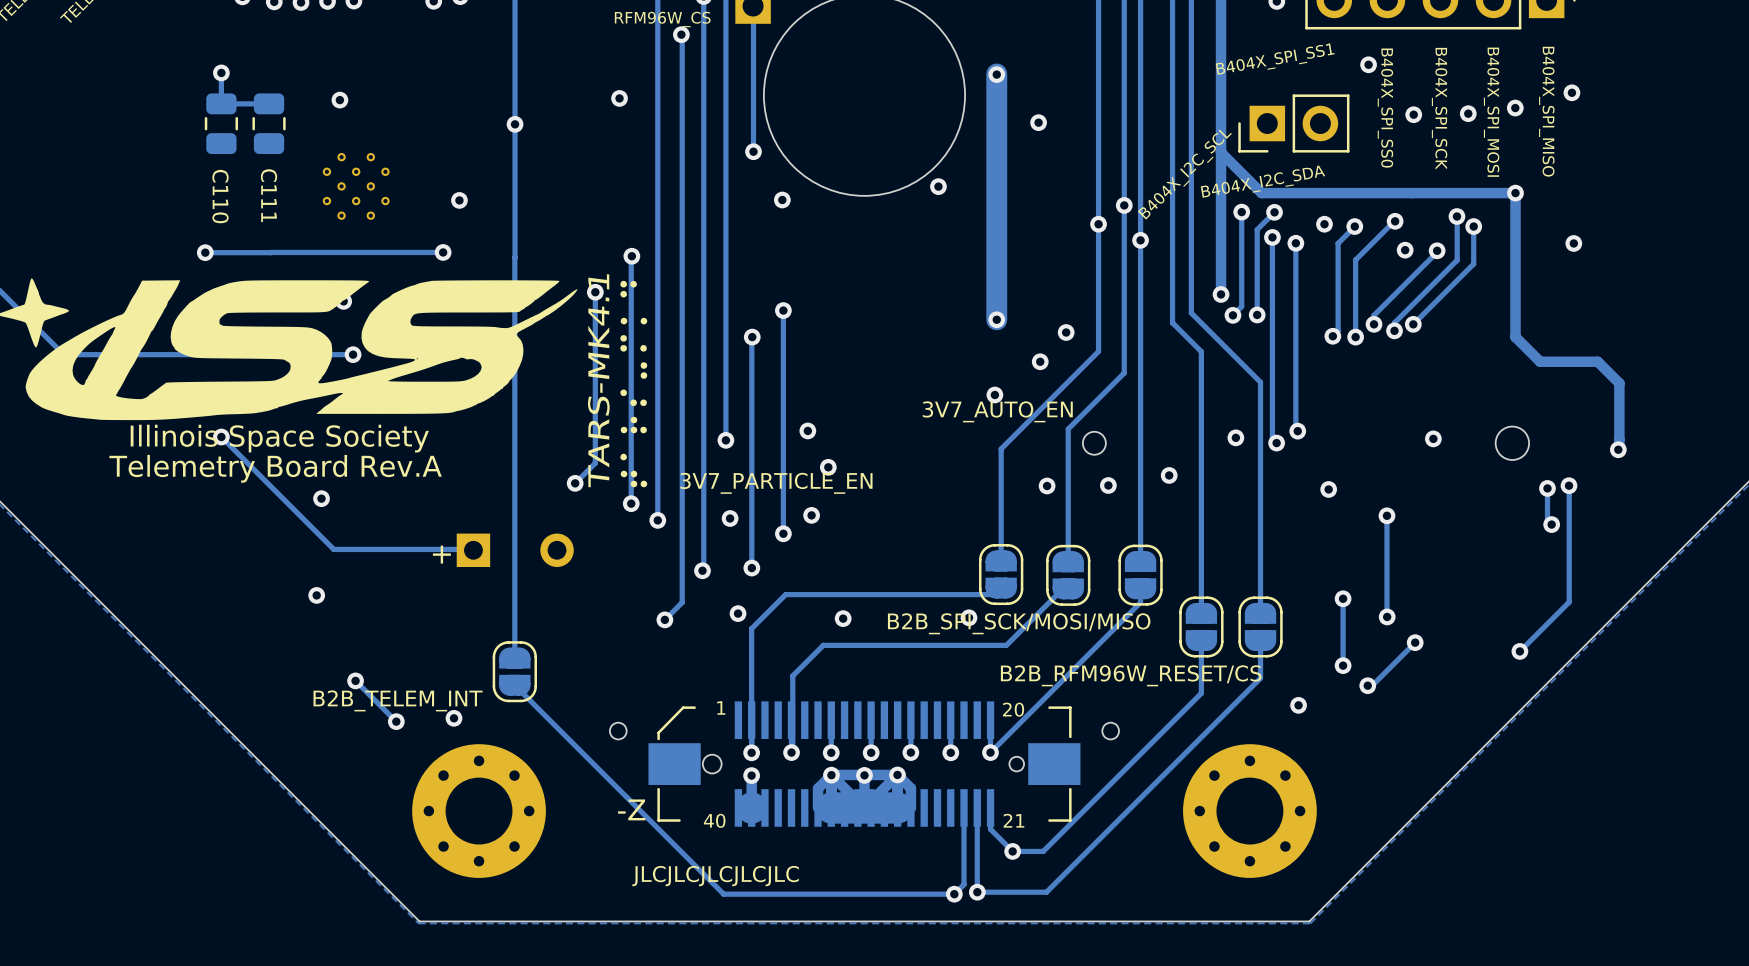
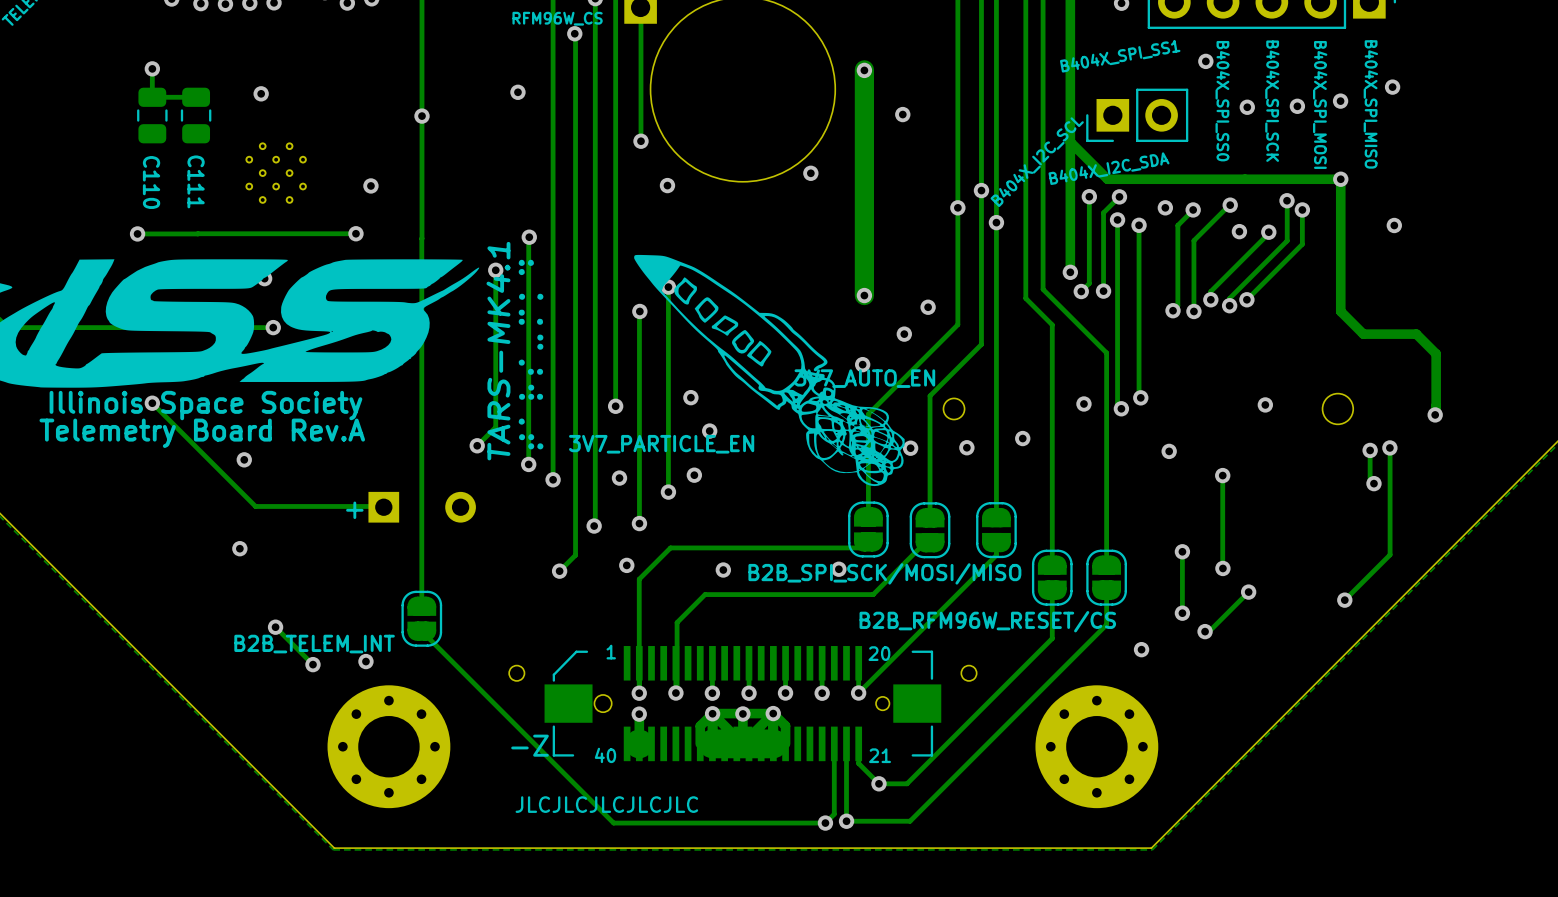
drawing: none -> [634, 254, 905, 487]

